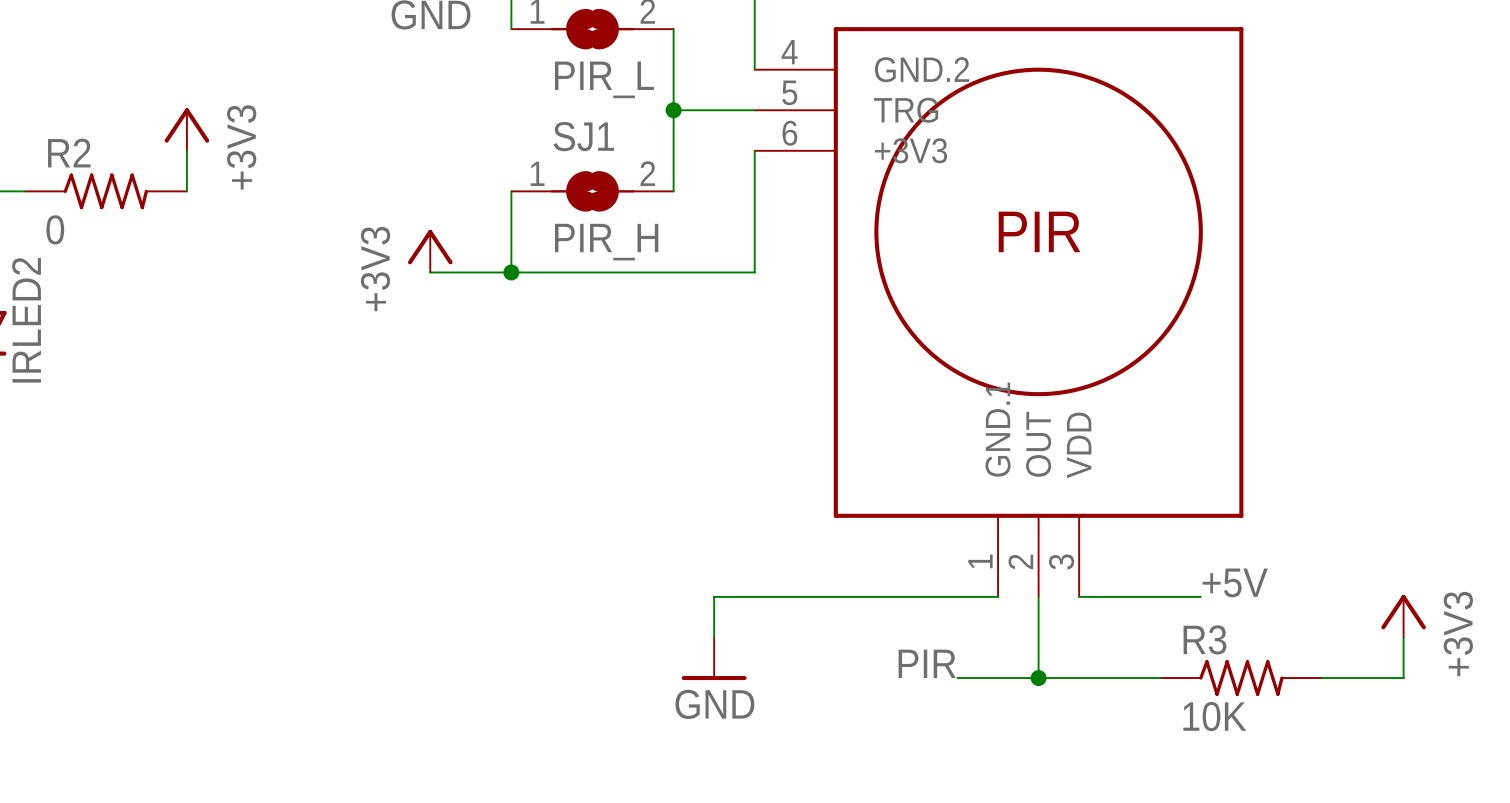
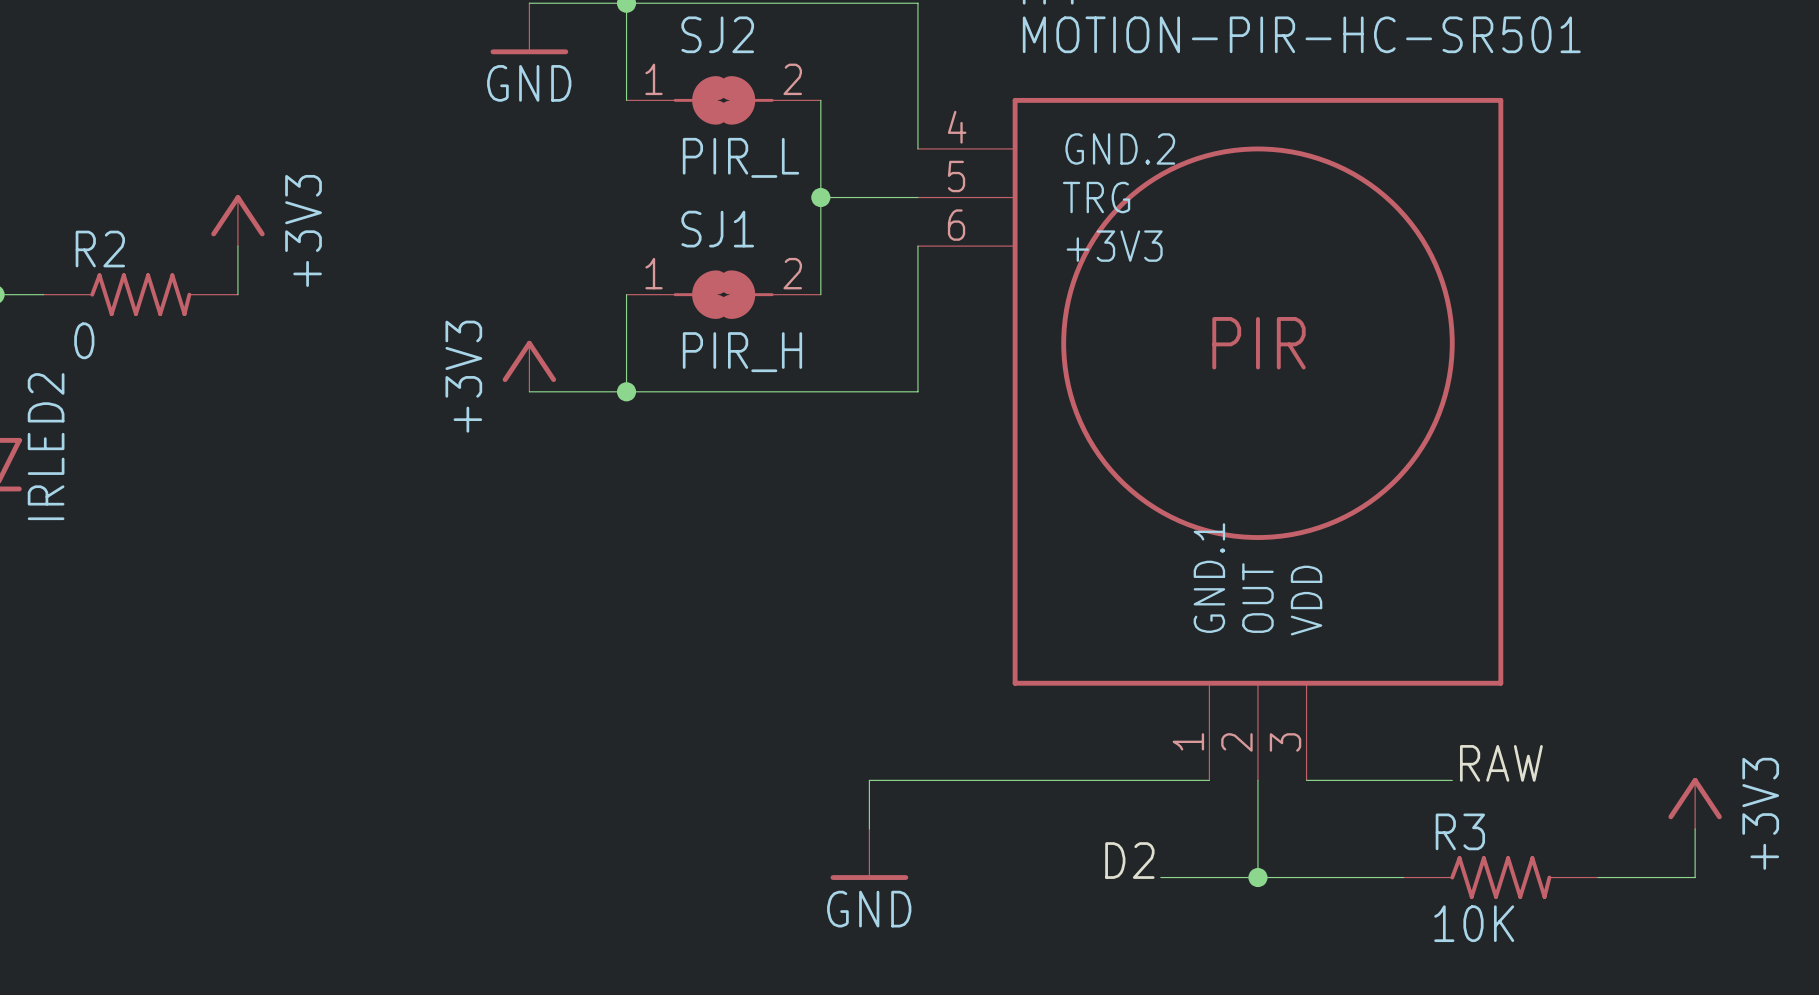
label: +5V (1235, 582) -> RAW (1501, 763)
label: PIR (927, 663) -> D2 (1129, 860)

